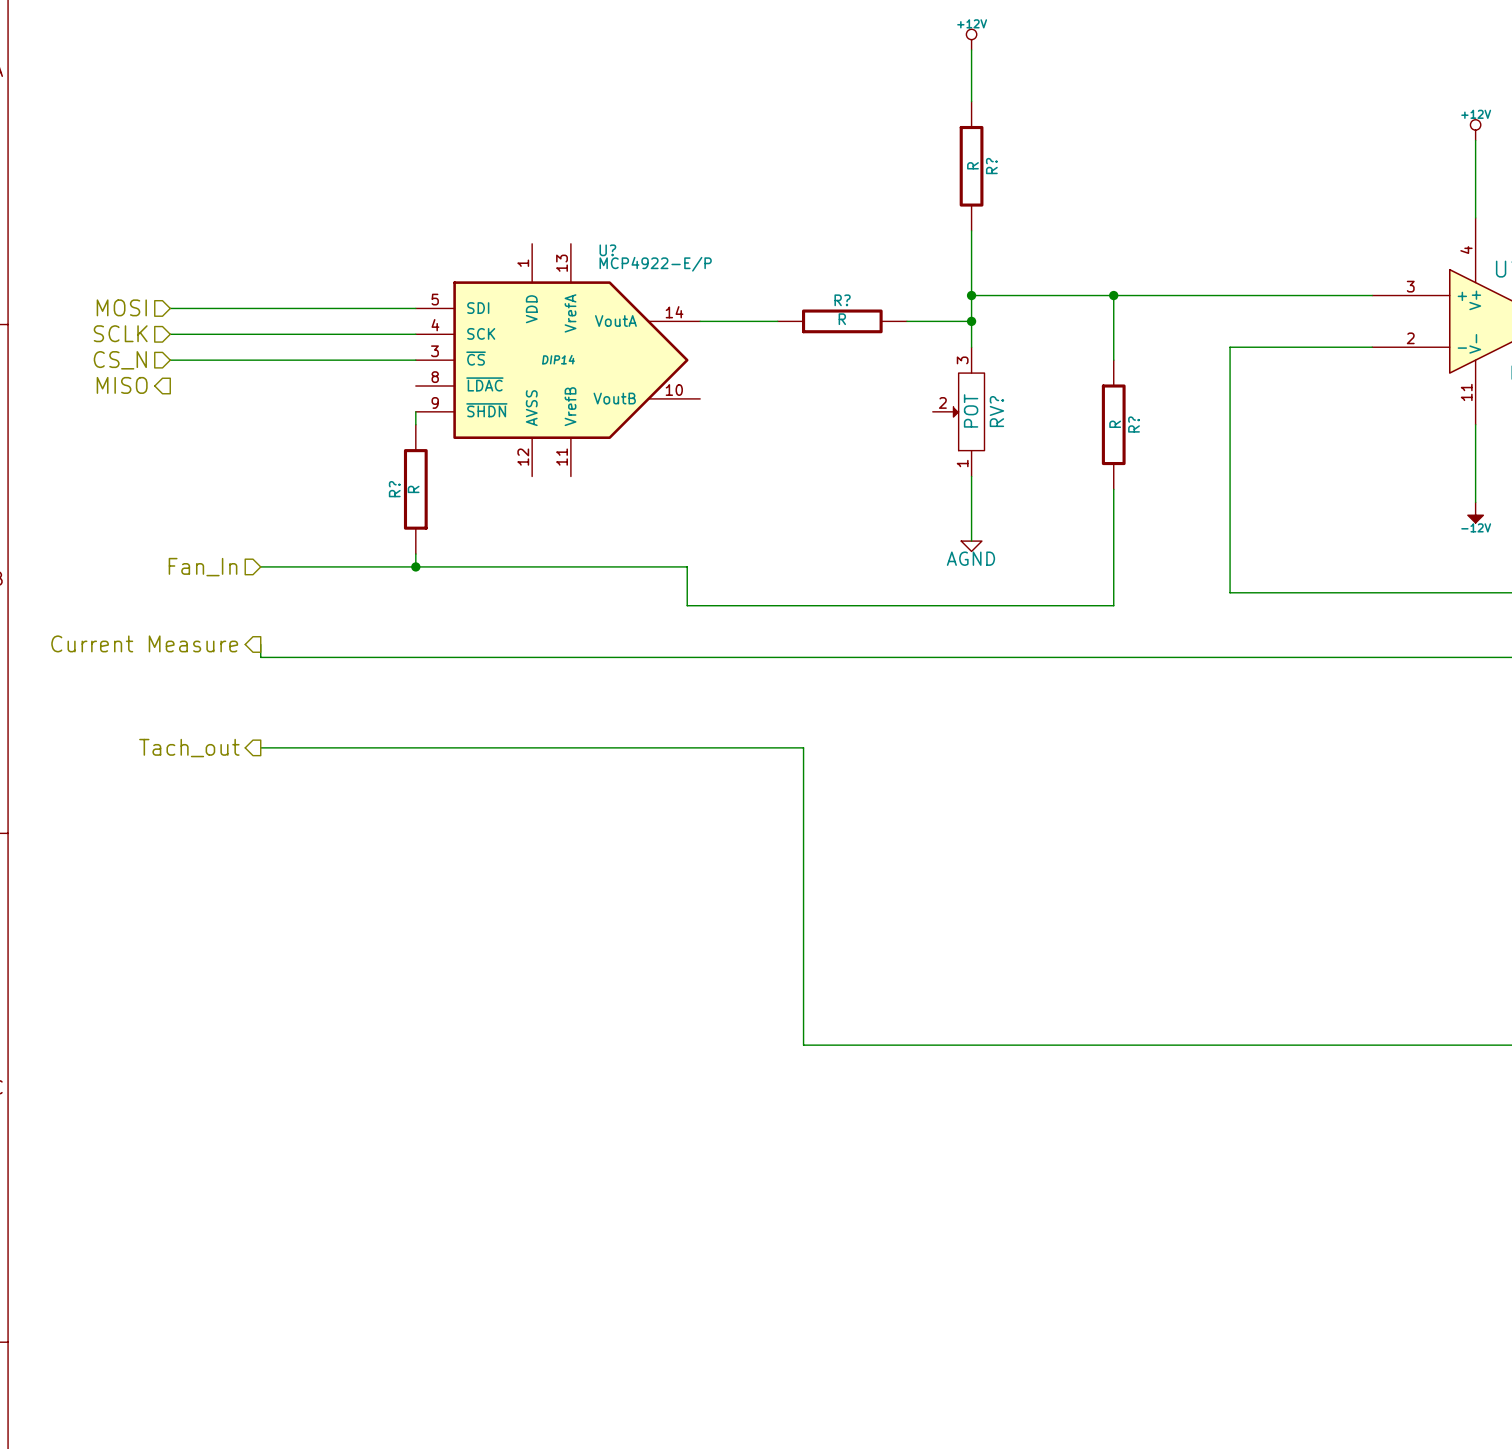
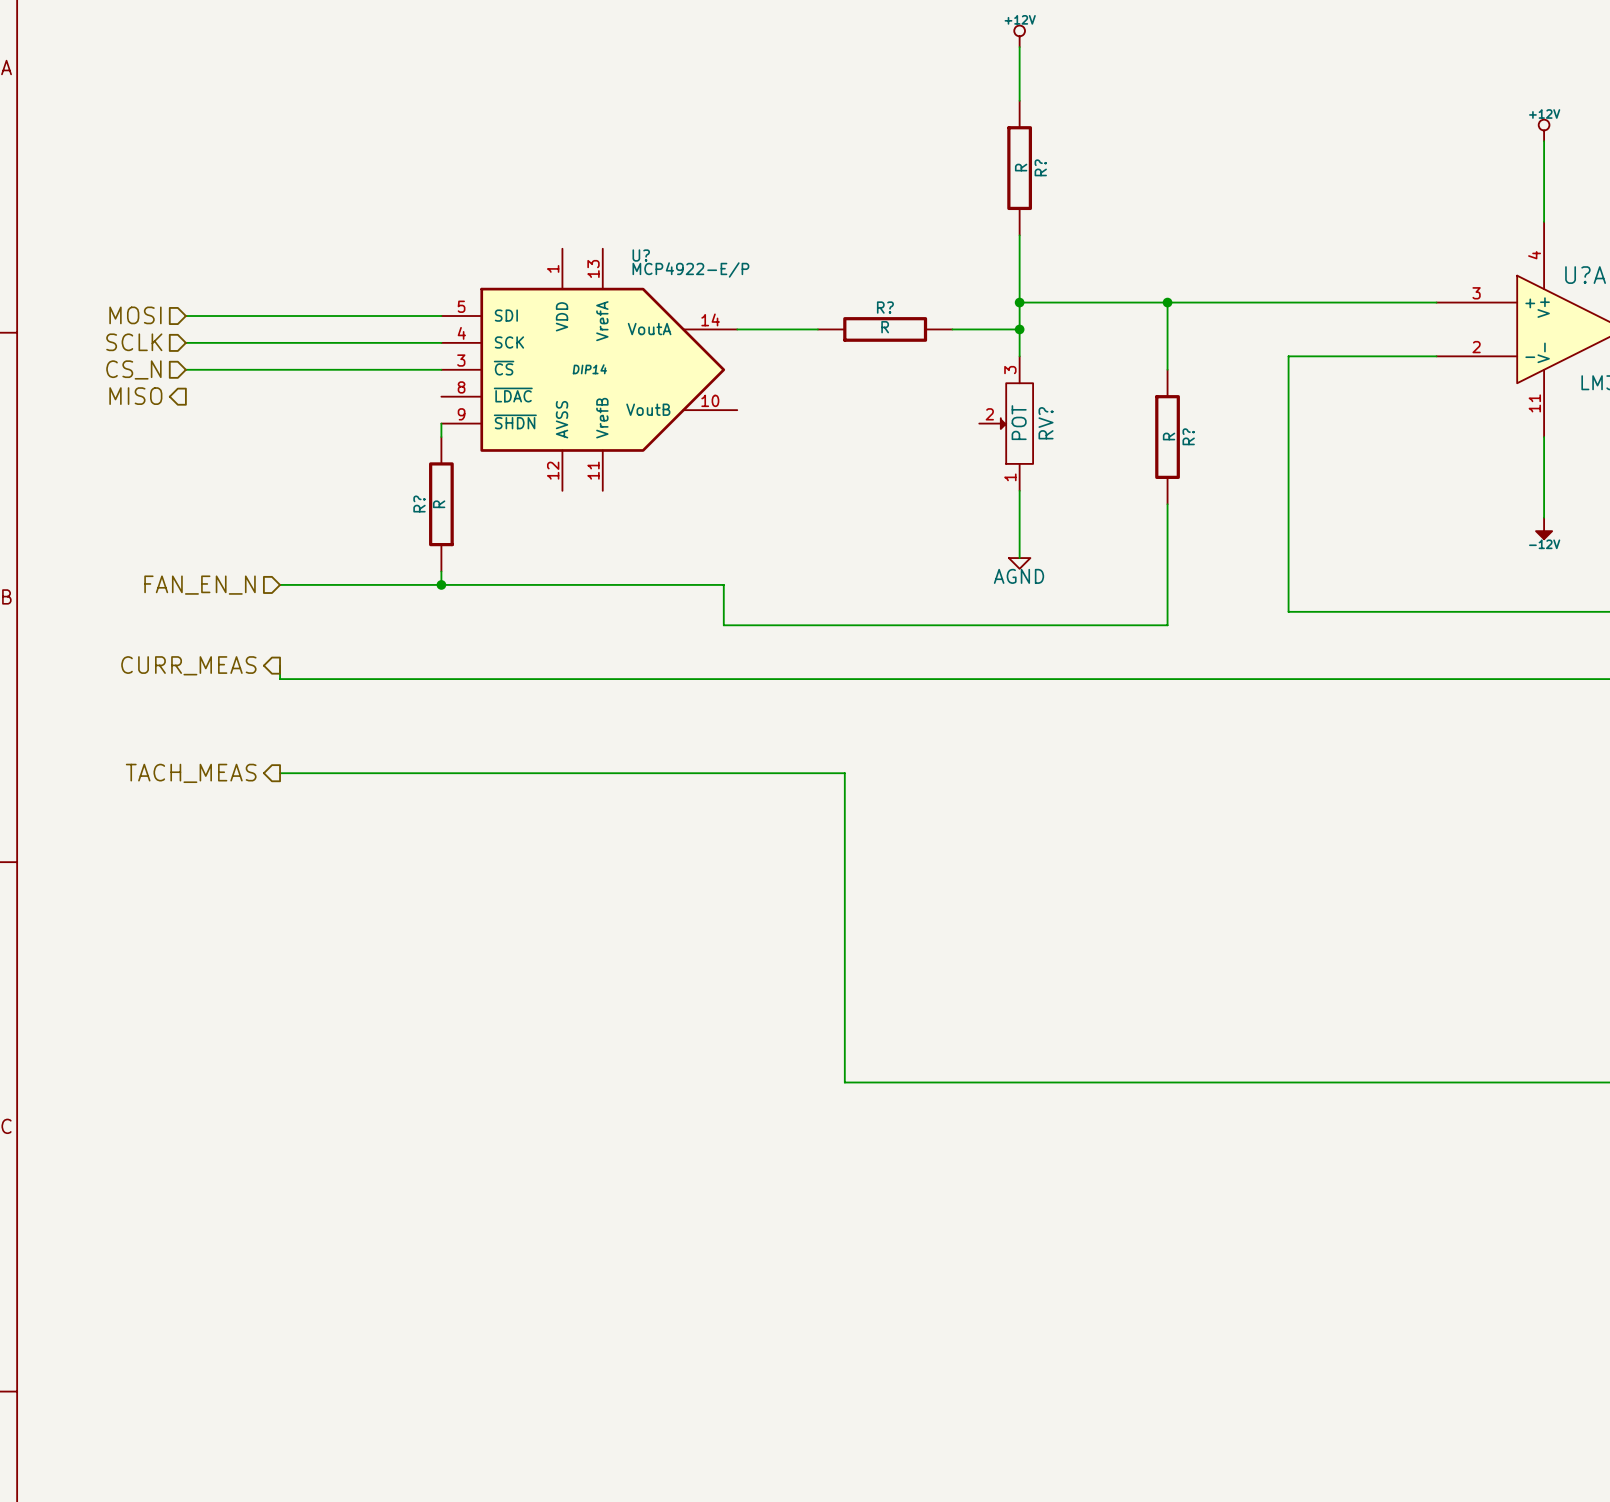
hierarchical label: Fan_In (203, 567) -> FAN_EN_N (200, 585)
hierarchical label: Current Measure (144, 643) -> CURR_MEAS (188, 665)
hierarchical label: Tach_out (189, 748) -> TACH_MEAS (191, 773)

